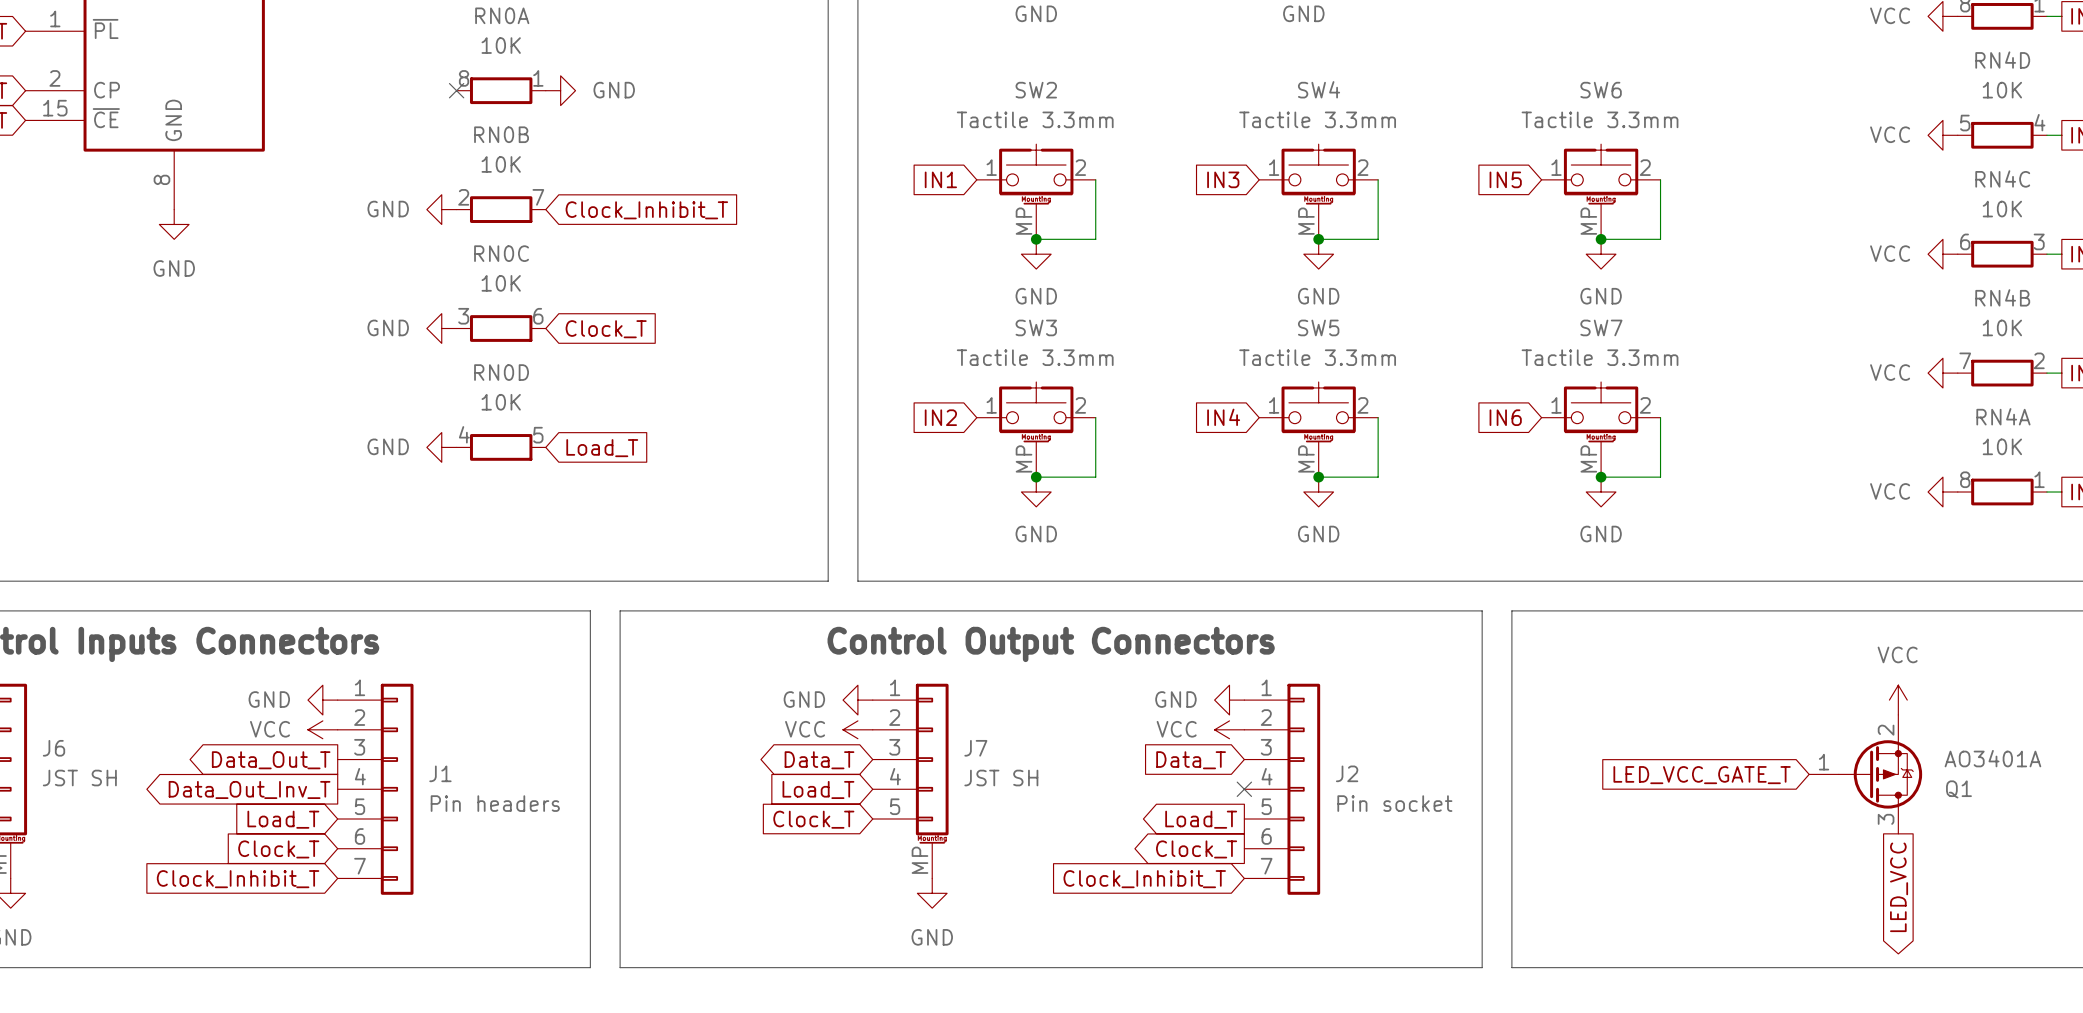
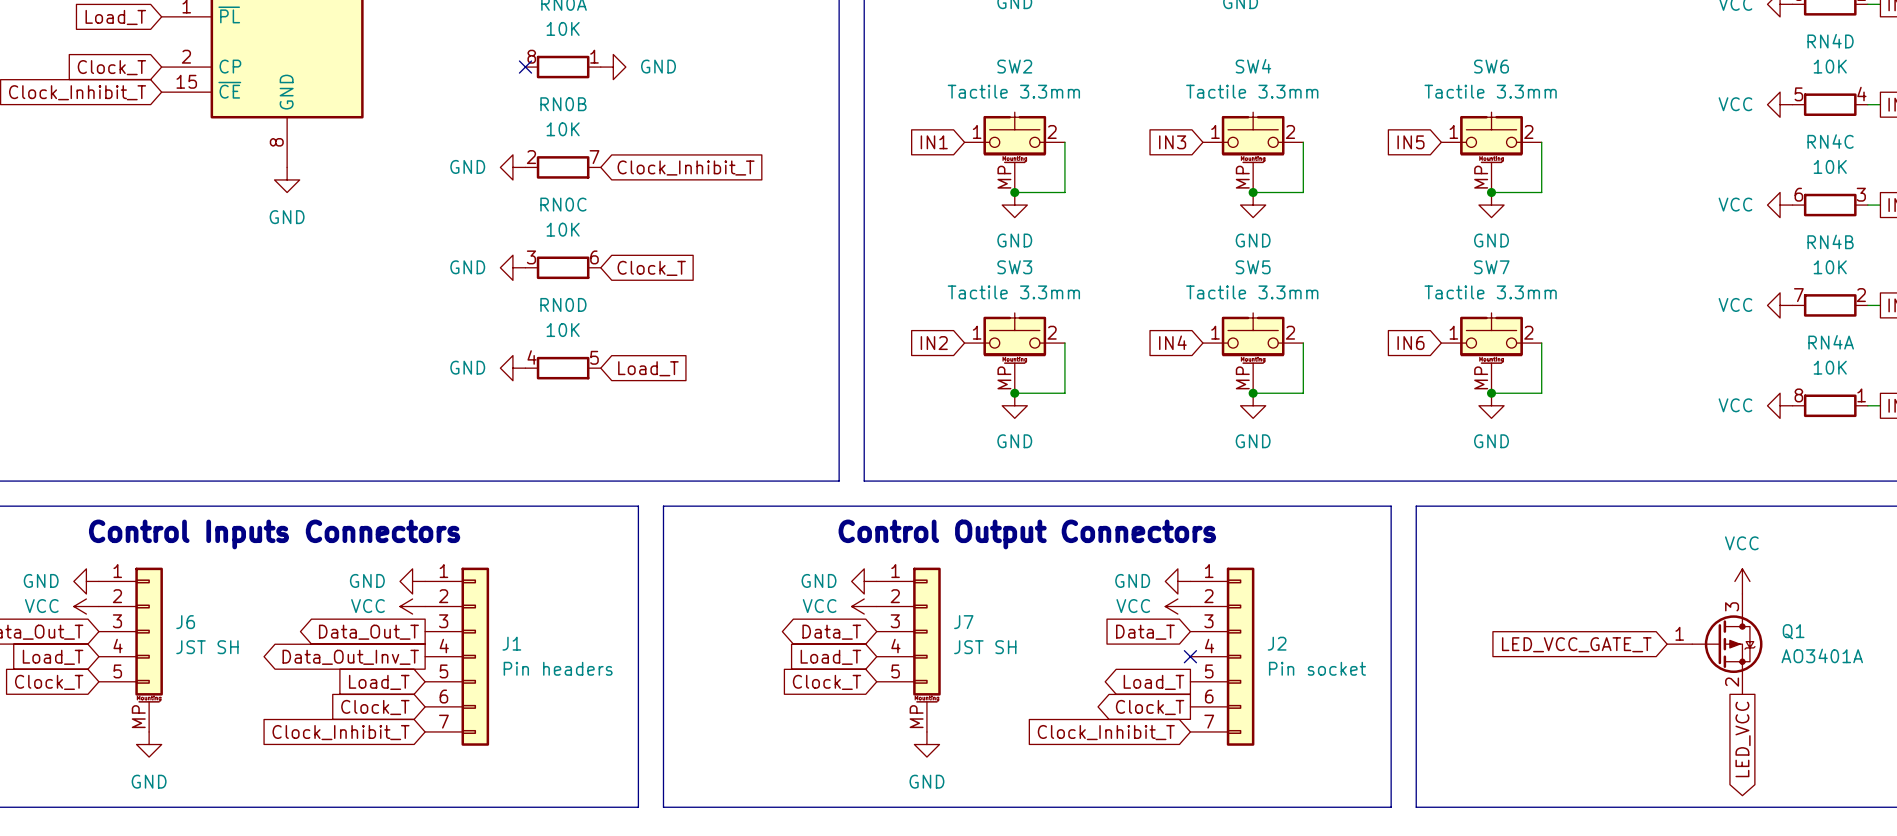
Q1 flip: as is (1880, 774) -> up-down (1727, 644)

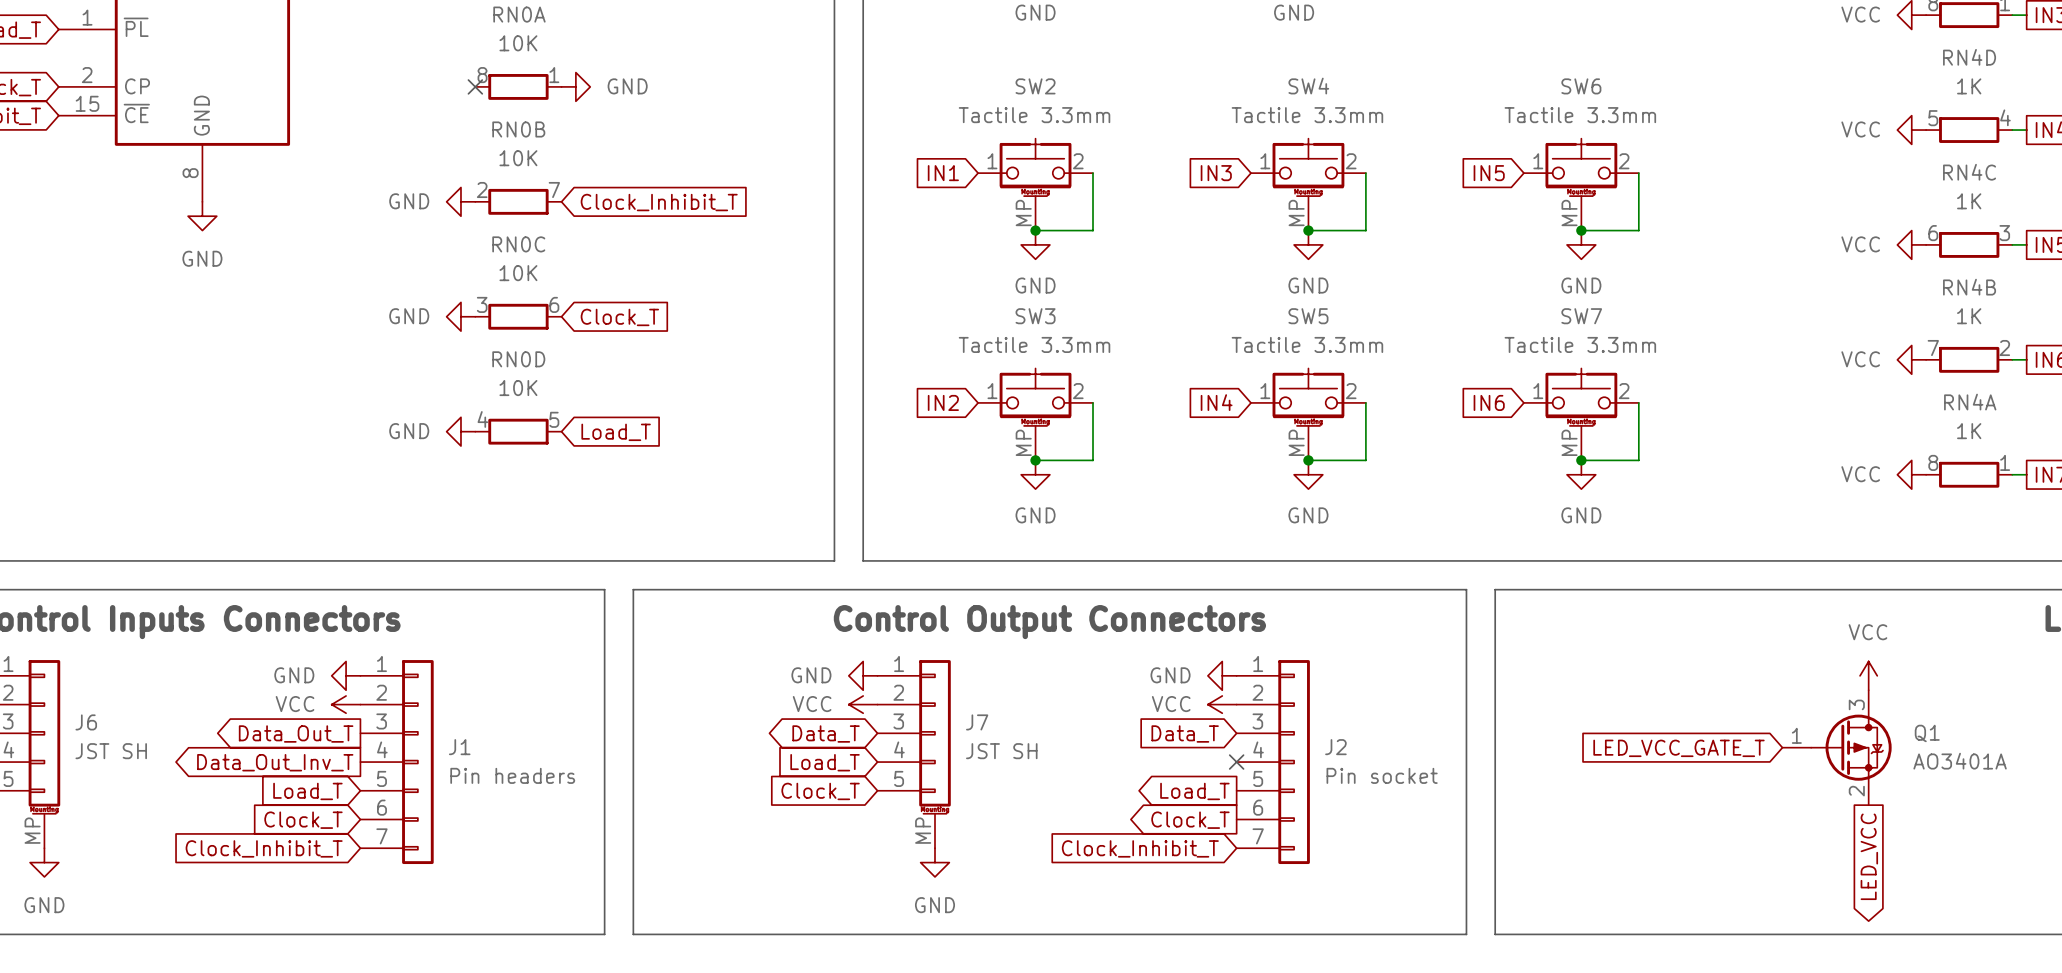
RN4D value: 10K (1830, 66) -> 1K (1969, 86)
RN4C value: 10K (1830, 166) -> 1K (1969, 201)
RN4B value: 10K (1830, 267) -> 1K (1969, 316)
RN4A value: 10K (1830, 367) -> 1K (1969, 431)

